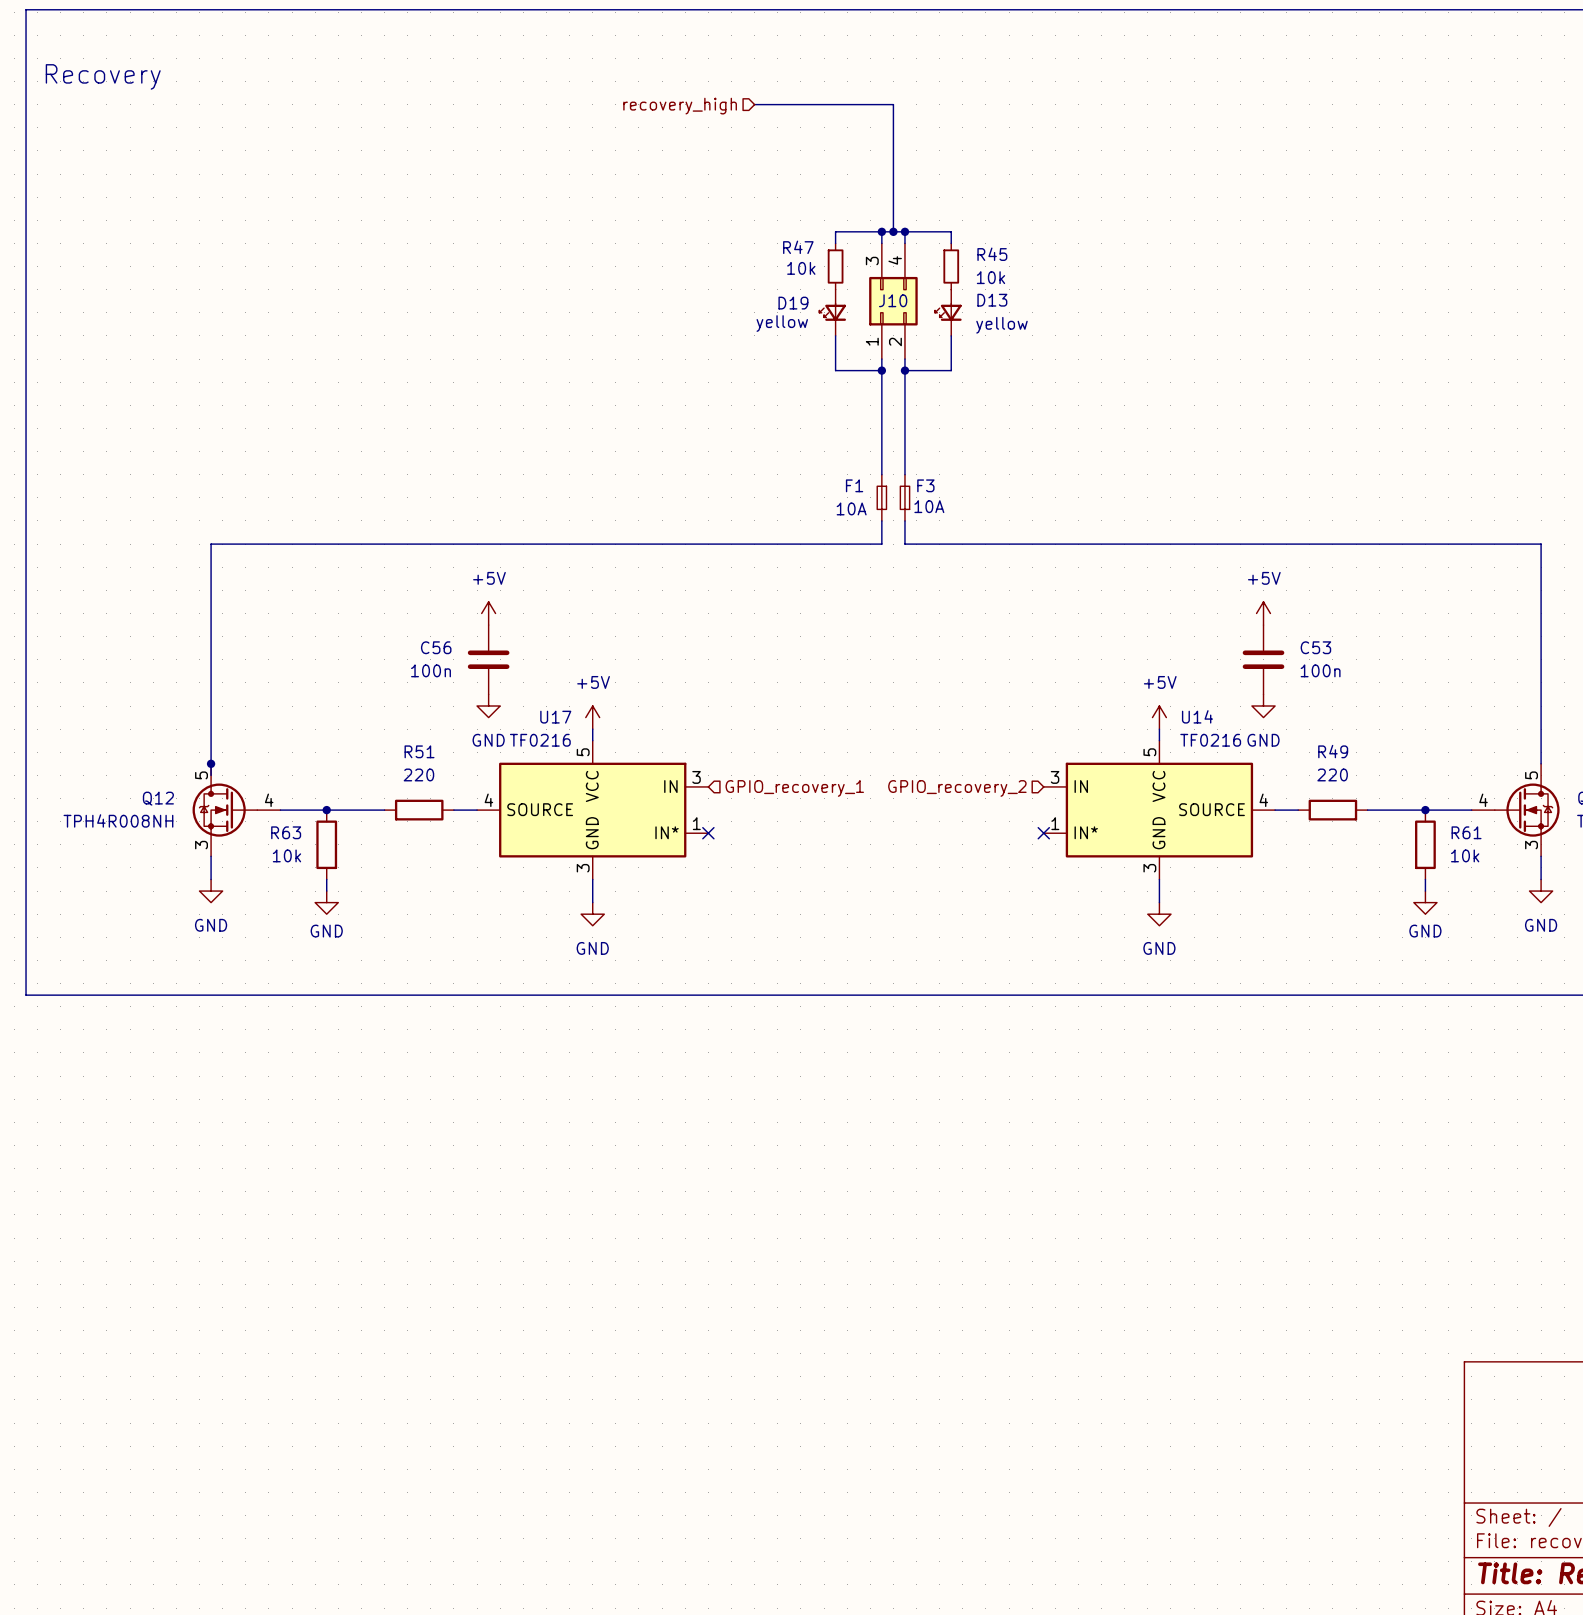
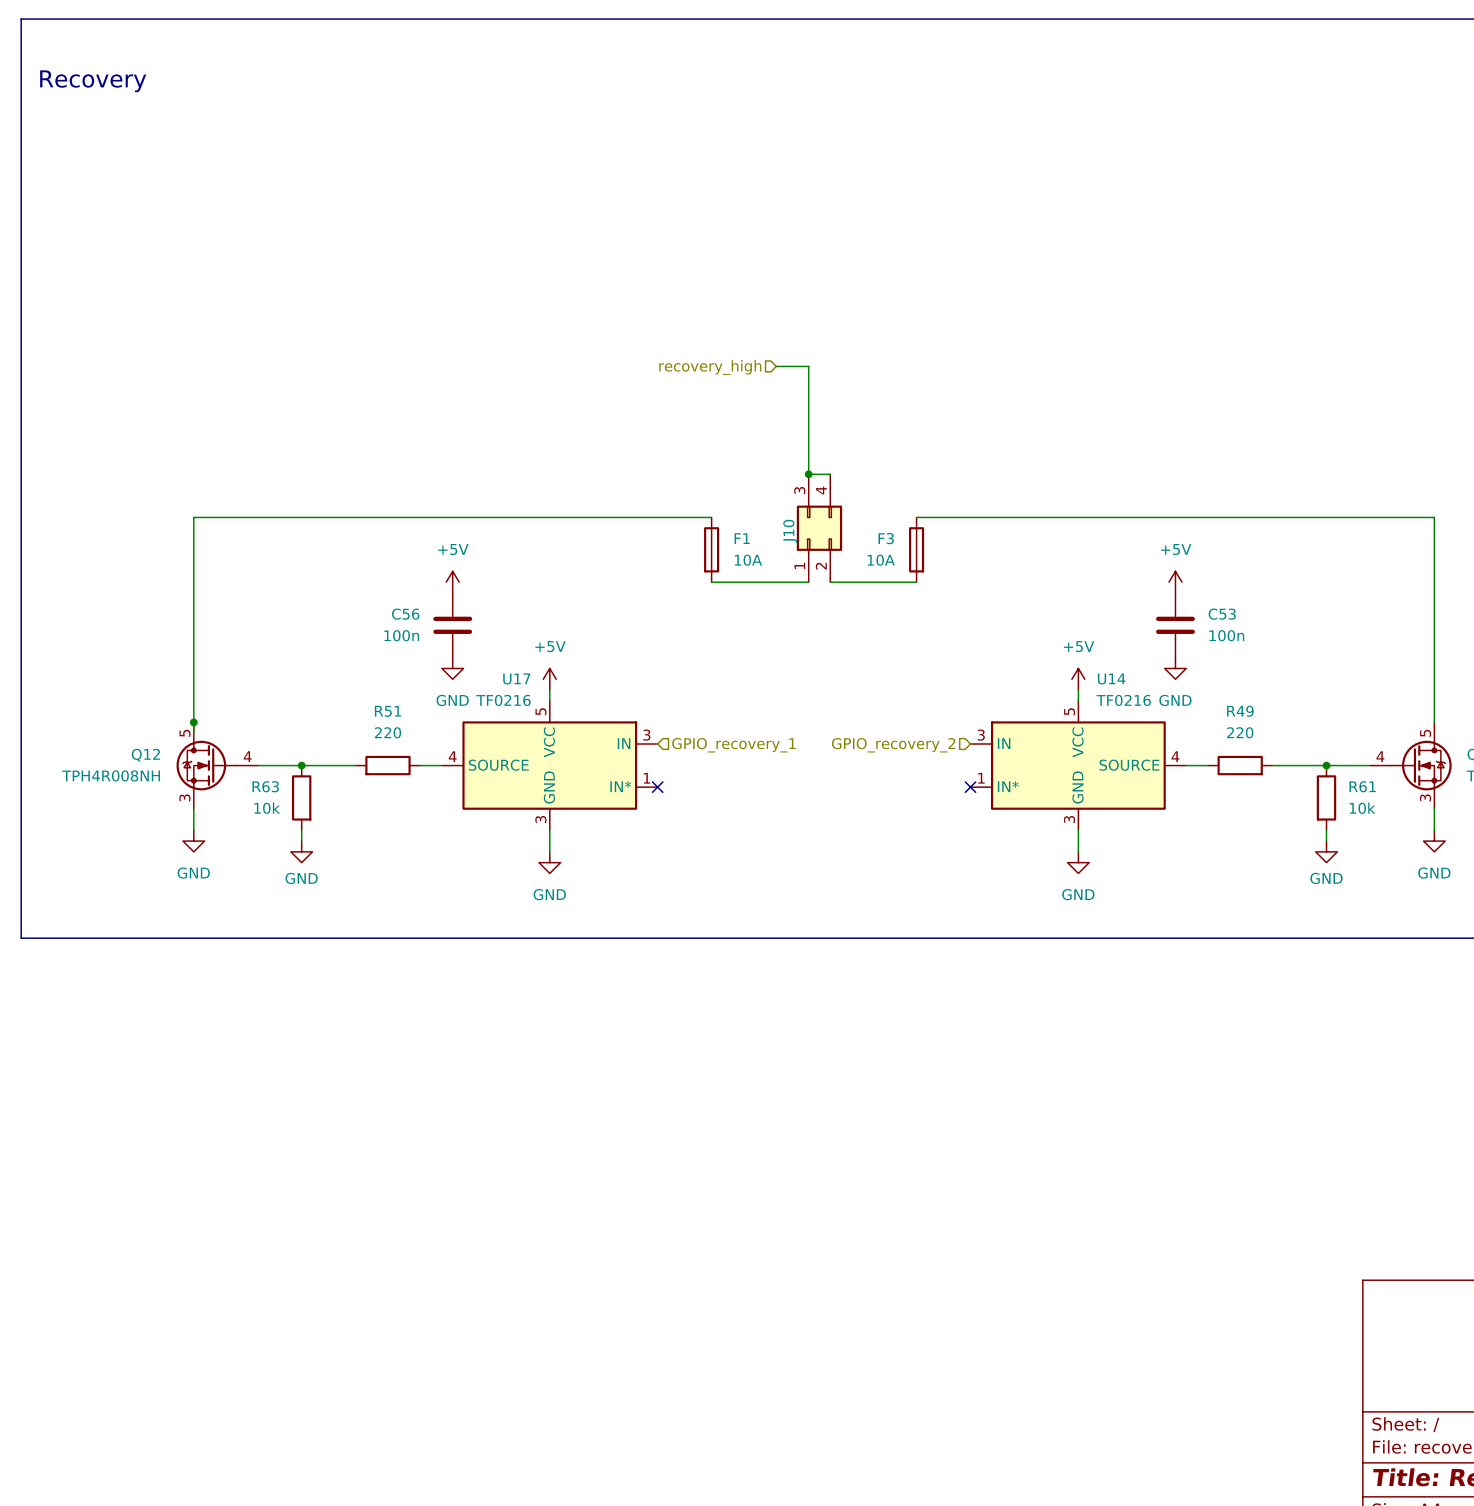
wire: (754, 104) (893, 104) (893, 231) -> none
hierarchical label: recovery_high (680, 106) -> none
wire: (881, 231) (881, 243) -> none
junction: (881, 231) -> none
junction: (893, 231) -> none
wire: (904, 231) (904, 243) -> none
junction: (904, 231) -> none
wire: (835, 243) (835, 231) (951, 231) (951, 243) -> none
R47: 10k (835, 266) -> none
R45: 10k (951, 266) -> none
J10 name rotation: 0° (893, 300) -> 90° counterclockwise (790, 531)
J10 position: (893, 301) -> (819, 528)
D19: yellow (832, 312) -> none
D13: yellow (948, 312) -> none
wire: (835, 335) (835, 370) (881, 370) -> none
wire: (951, 335) (951, 370) (904, 370) -> none
wire: (881, 359) (881, 474) -> none
wire: (904, 359) (904, 474) -> none
junction: (881, 370) -> none
junction: (904, 370) -> none
wire: none -> (776, 366) (808, 366) (808, 474) (830, 474)
hierarchical label: none -> recovery_high (710, 367)
F1 symbol: [877, 474, 887, 521] -> [704, 517, 720, 583]
F3 symbol: [900, 474, 910, 521] -> [909, 517, 925, 583]
F1 name position: F1 (854, 485) -> F1 (742, 538)
F3 name position: F3 (925, 485) -> F3 (886, 538)
junction: none -> (808, 474)
F3 value position: 10A (929, 506) -> 10A (881, 560)
F1 value position: 10A (851, 508) -> 10A (748, 560)
wire: (881, 520) (881, 544) (766, 544) -> none
wire: (904, 520) (904, 544) (985, 544) -> none
wire: none -> (711, 582) (808, 582)
wire: none -> (830, 582) (916, 582)

